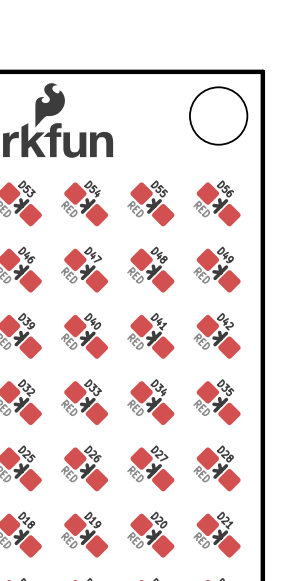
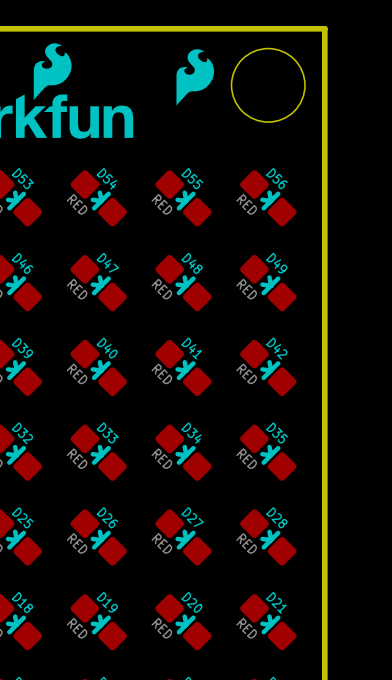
drawing: none -> [176, 49, 215, 106]

